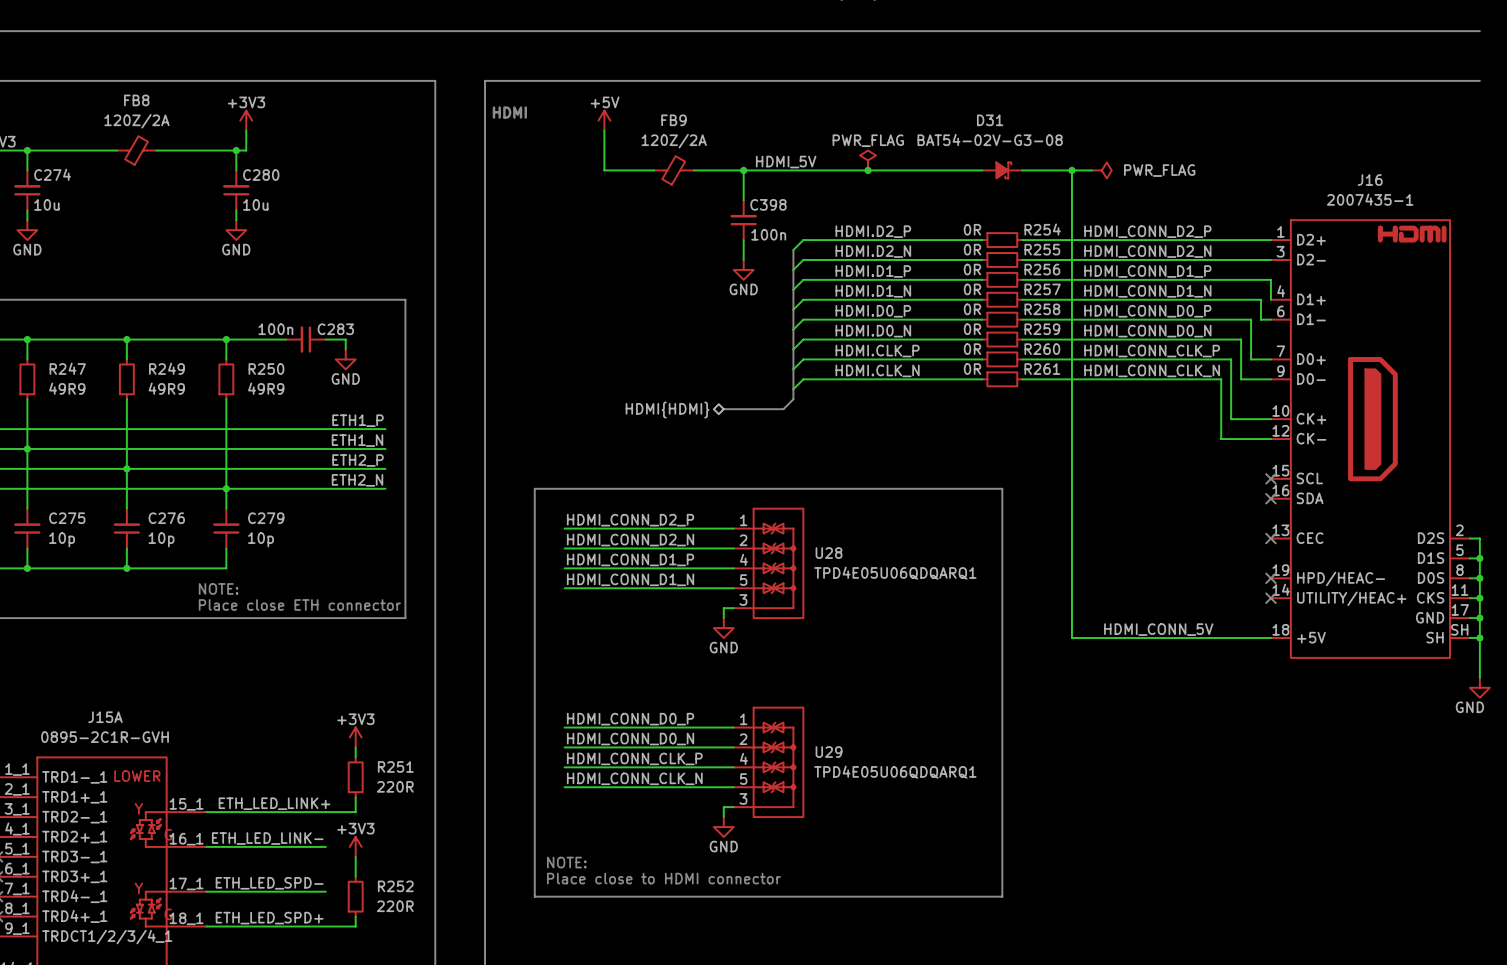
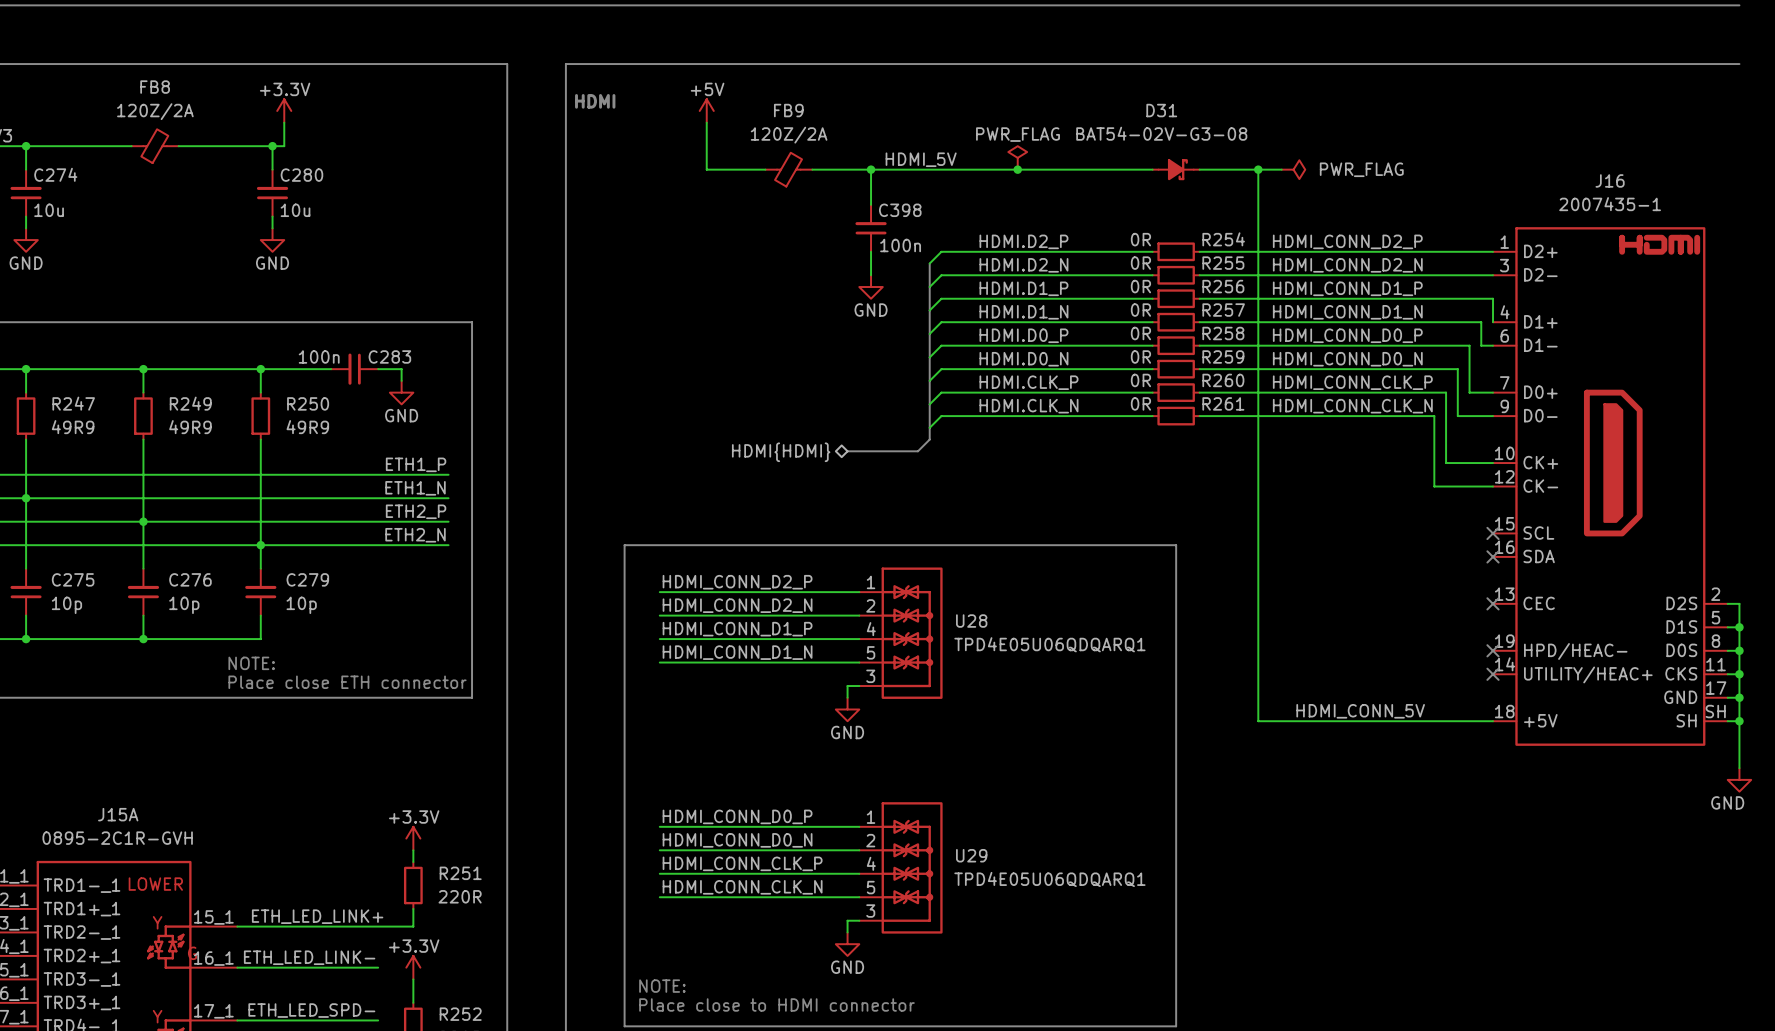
power symbol: +3V3 (246, 120) -> +3.3V (284, 110)
power symbol: +3V3 (355, 737) -> +3.3V (413, 838)
power symbol: +3V3 (355, 846) -> +3.3V (413, 967)

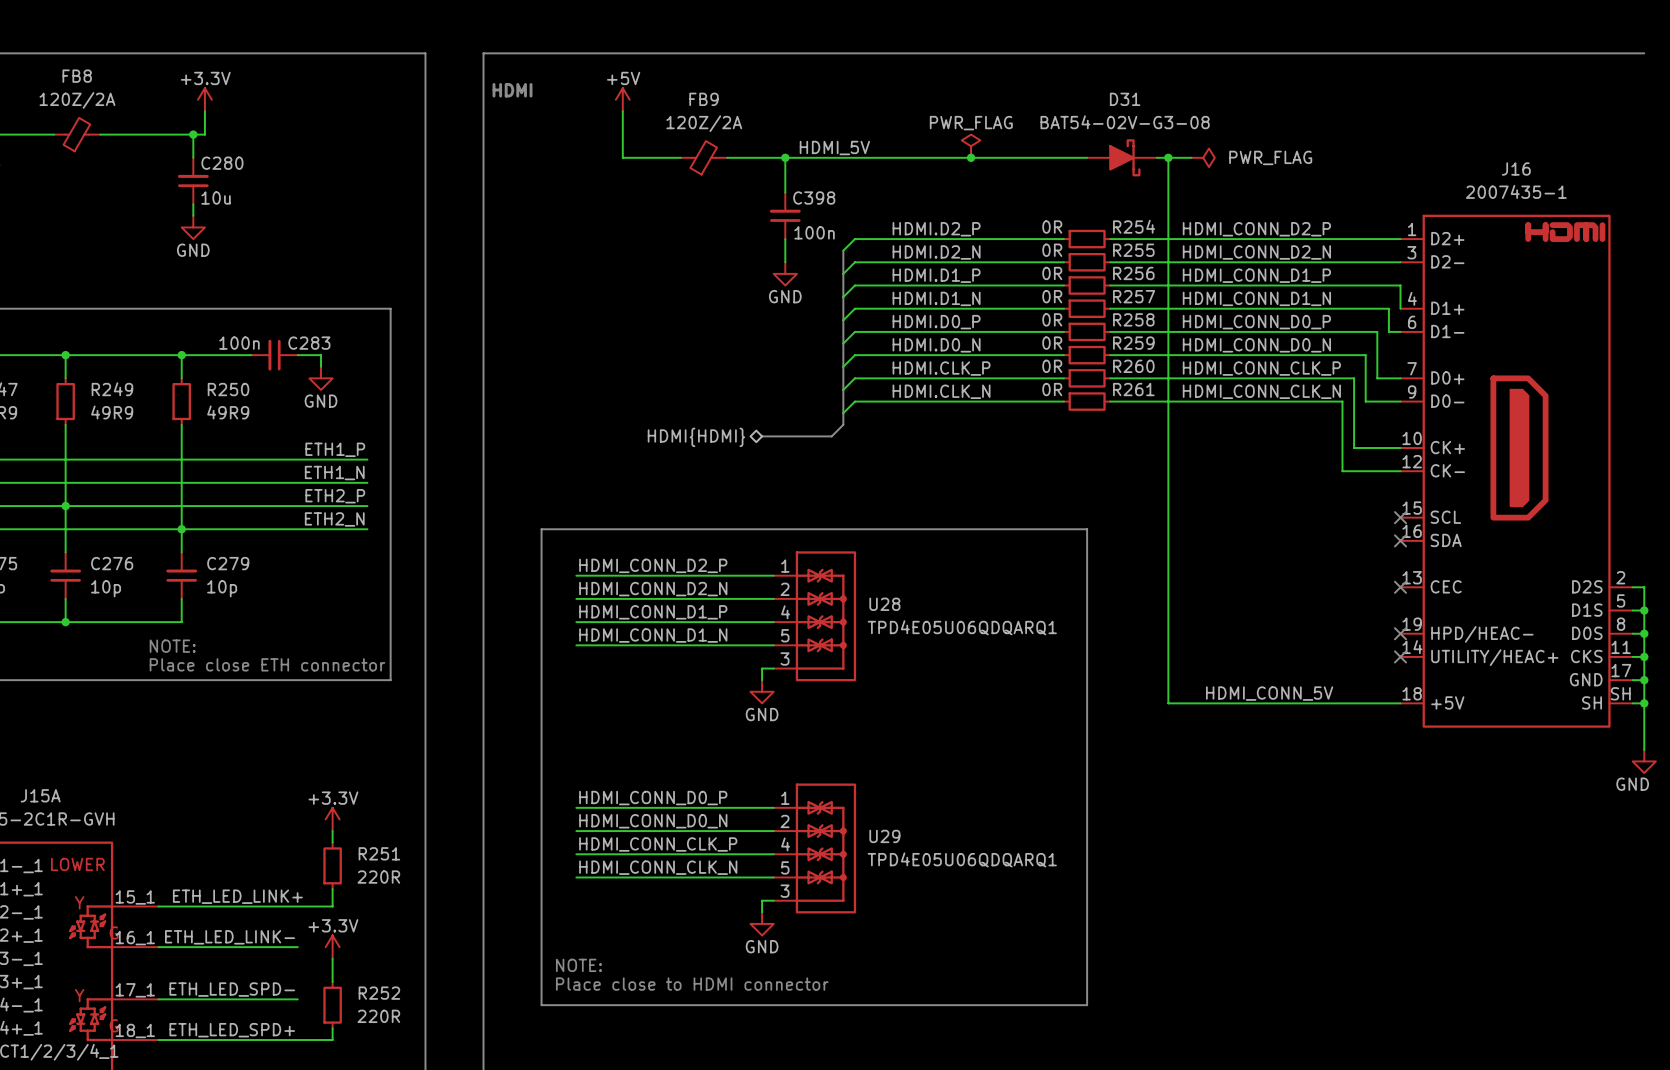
power symbol position: PWR_FLAG (1017, 157) -> PWR_FLAG (971, 146)
D31 symbol: [1152, 159, 1200, 181] -> [1087, 139, 1157, 177]
junction position: (1017, 169) -> (971, 157)

